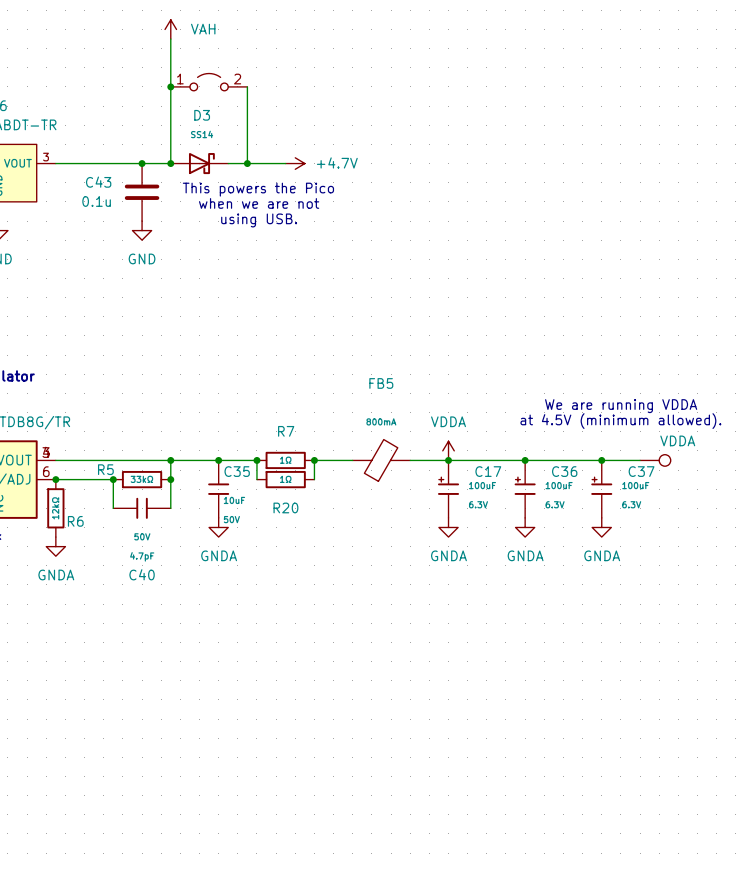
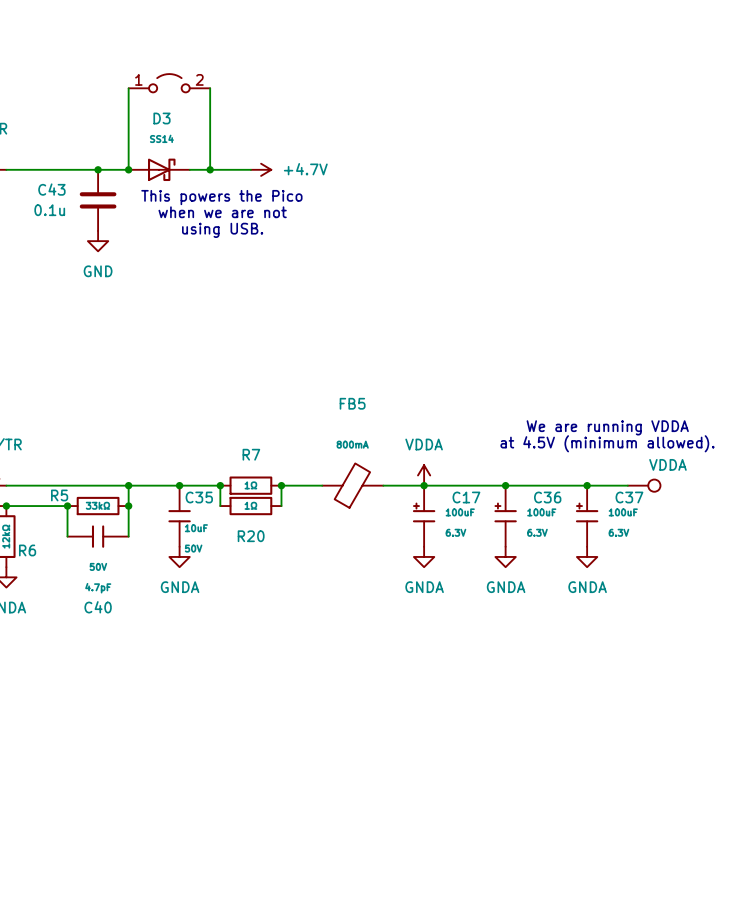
power symbol: VAH (170, 29) -> none
wire: (170, 39) (170, 86) -> none
junction: (170, 86) -> none

